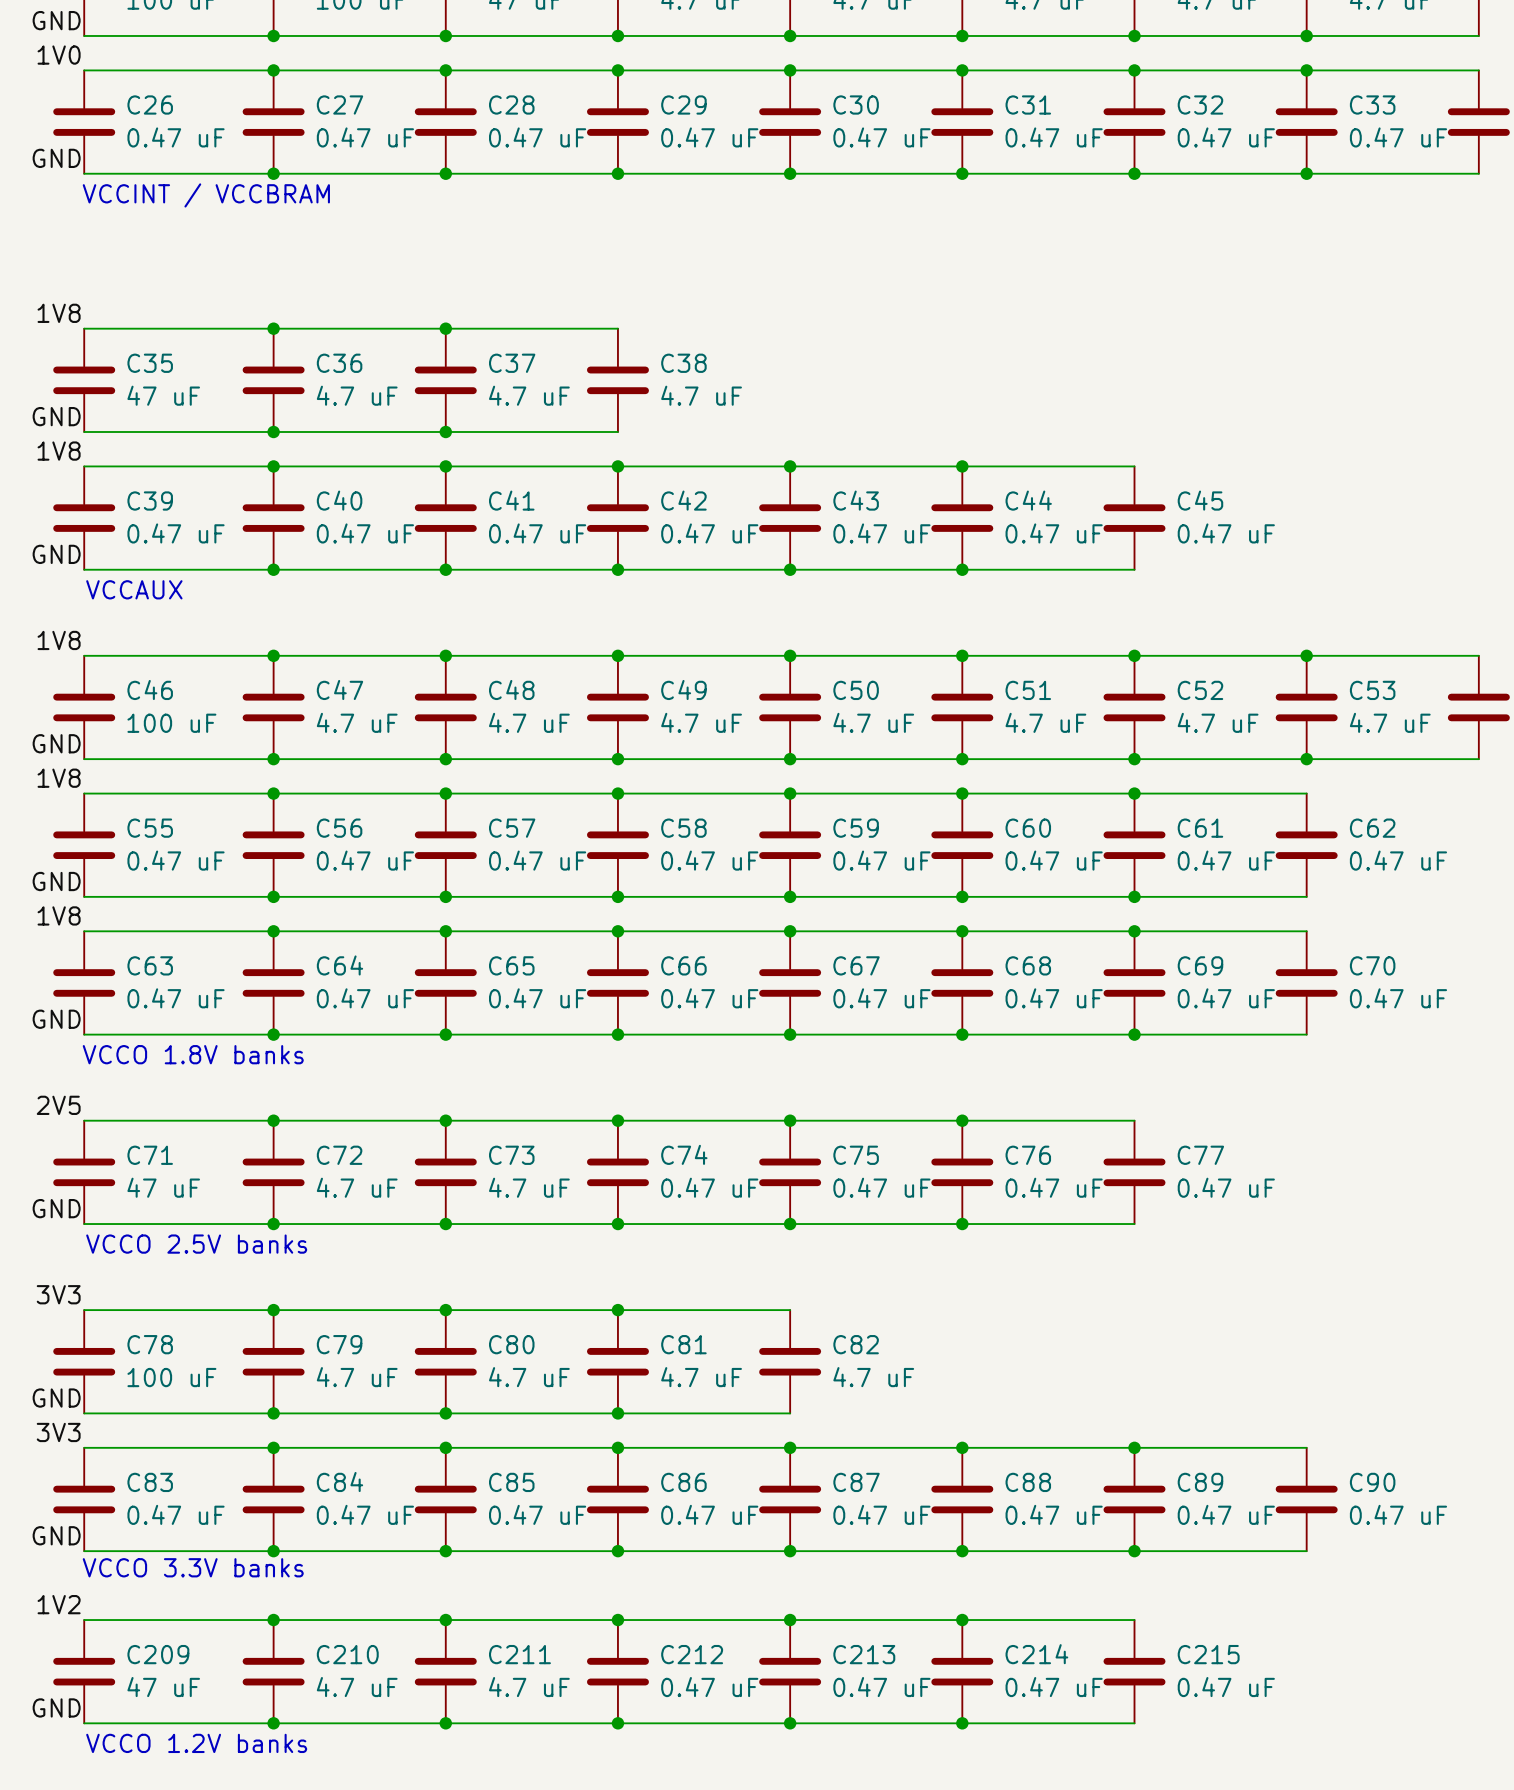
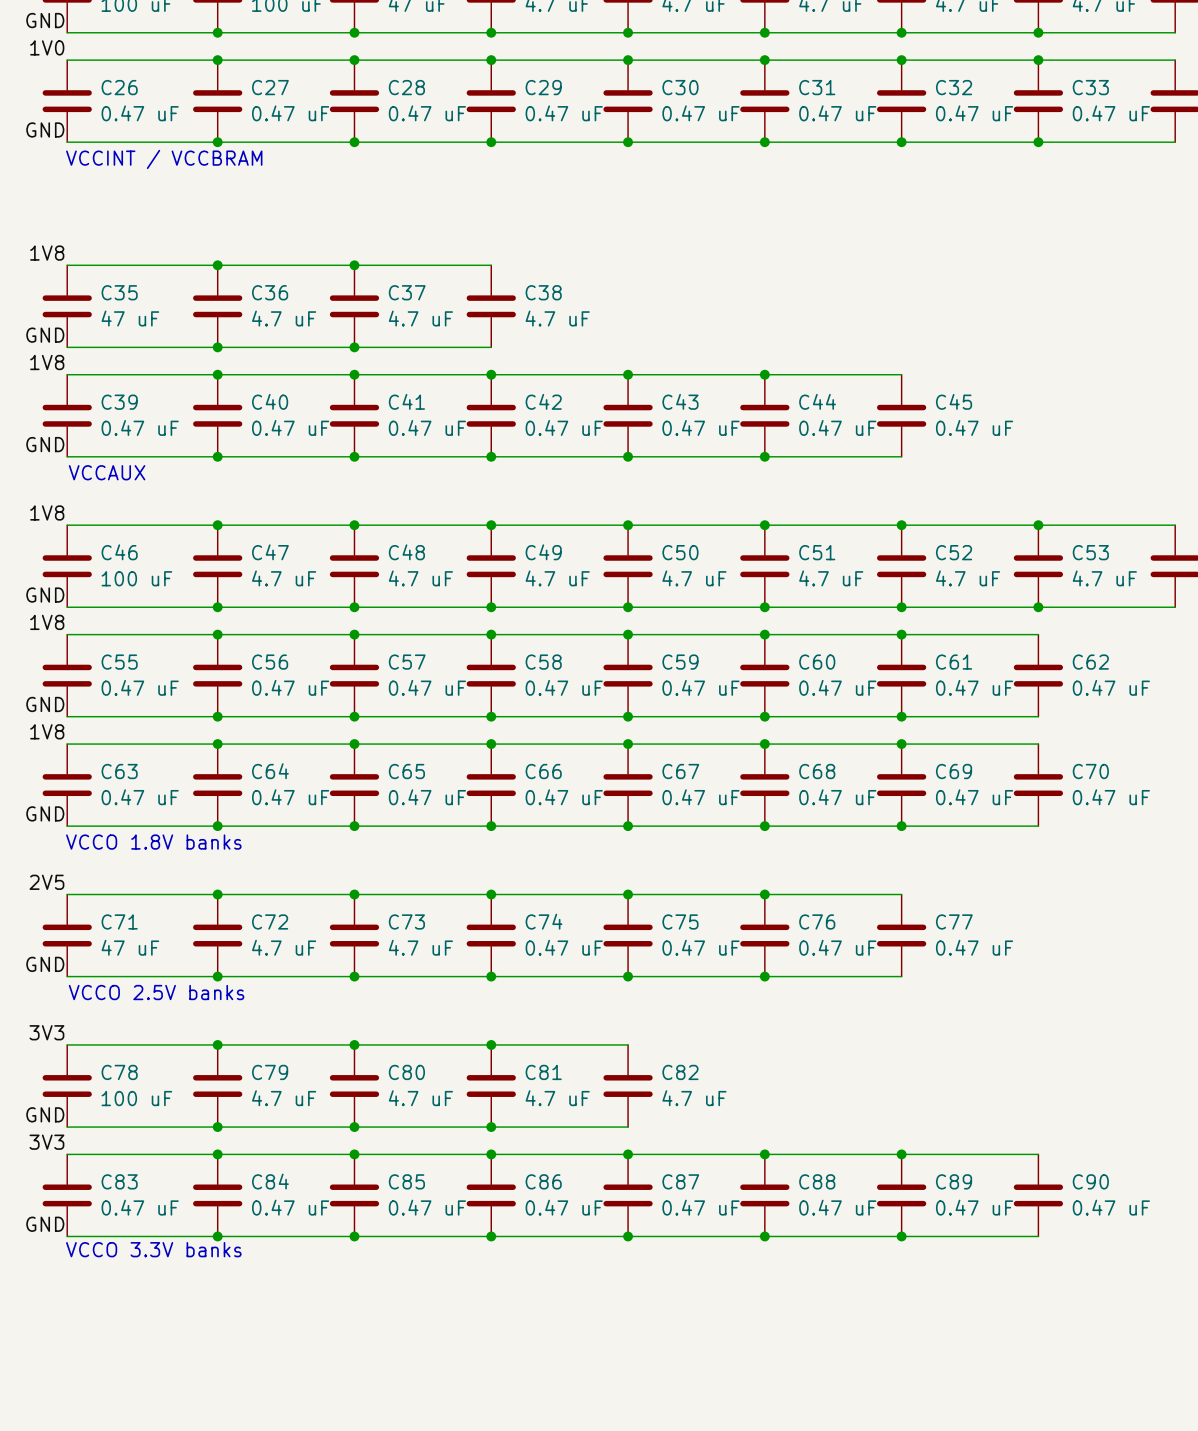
label: 1V2 (59, 1604) -> none
wire: (84, 1620) (1134, 1620) -> none
junction: (273, 1620) -> none
junction: (445, 1620) -> none
junction: (617, 1620) -> none
junction: (790, 1620) -> none
junction: (962, 1620) -> none
C209: 47 uF (84, 1671) -> none
C210: 4.7 uF (273, 1671) -> none
C211: 4.7 uF (445, 1671) -> none
C212: 0.47 uF (617, 1671) -> none
C213: 0.47 uF (790, 1671) -> none
C214: 0.47 uF (962, 1671) -> none
C215: 0.47 uF (1134, 1671) -> none
label: GND (56, 1707) -> none
wire: (84, 1723) (1134, 1723) -> none
junction: (273, 1723) -> none
junction: (445, 1723) -> none
junction: (617, 1723) -> none
junction: (790, 1723) -> none
junction: (962, 1723) -> none
text: VCCO 1.2V banks (196, 1743) -> none

